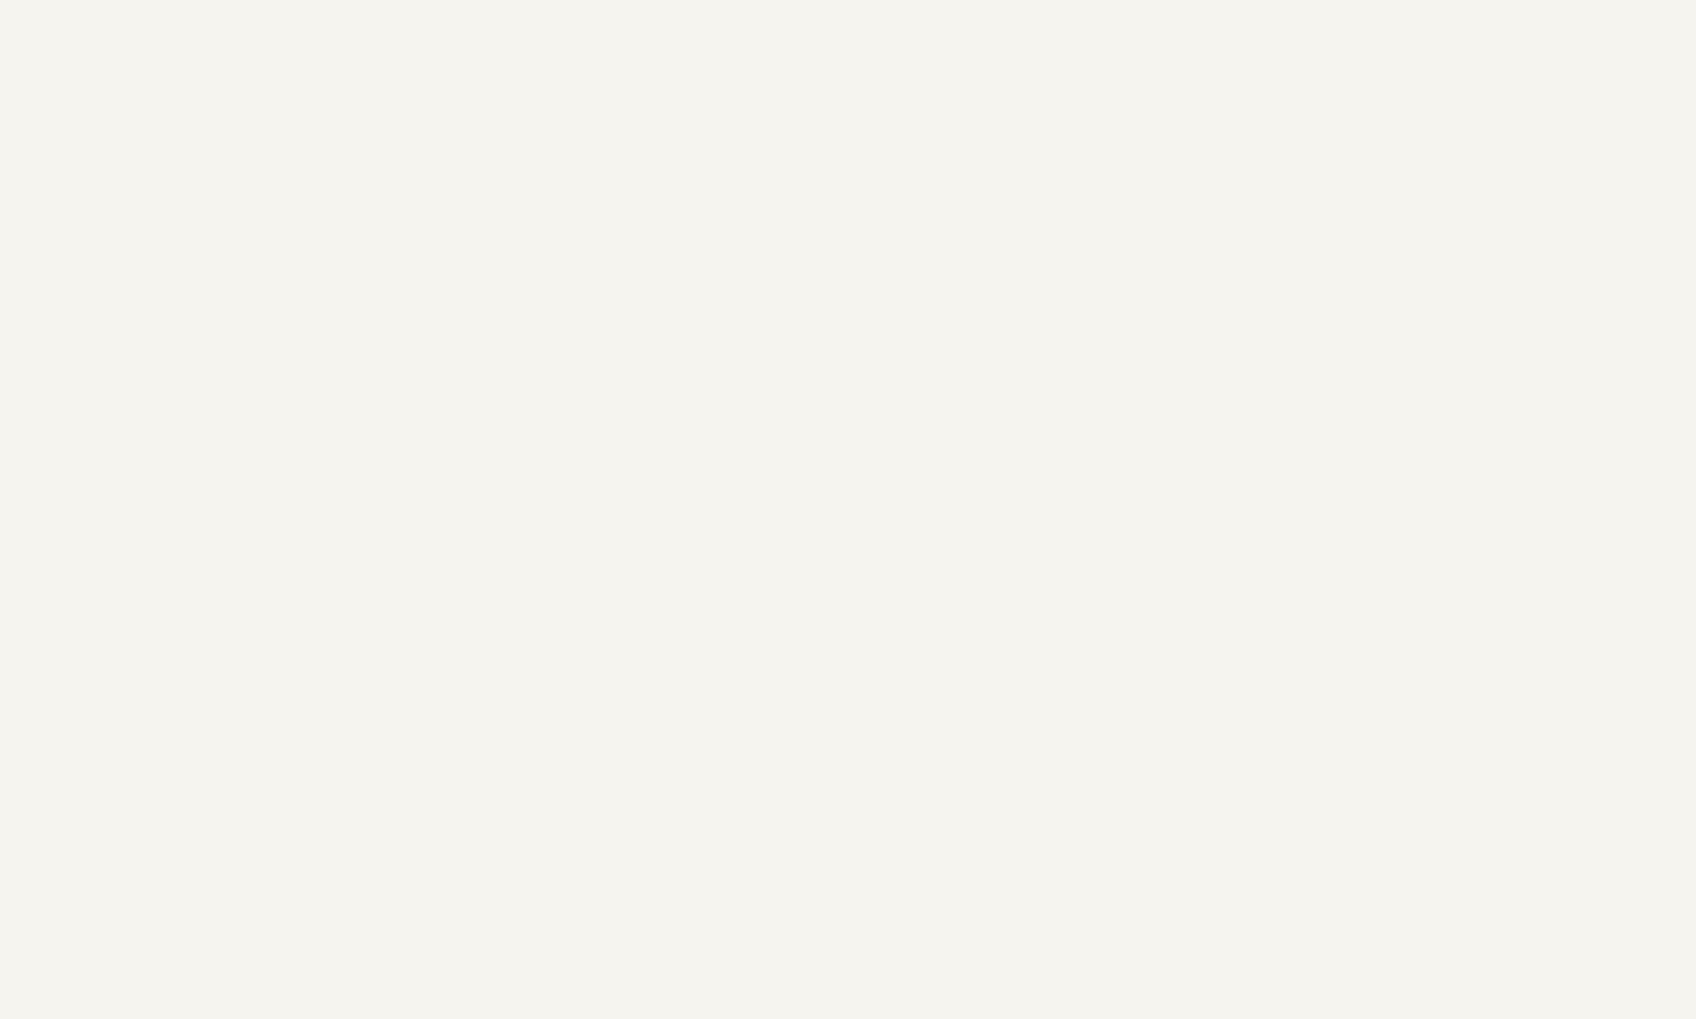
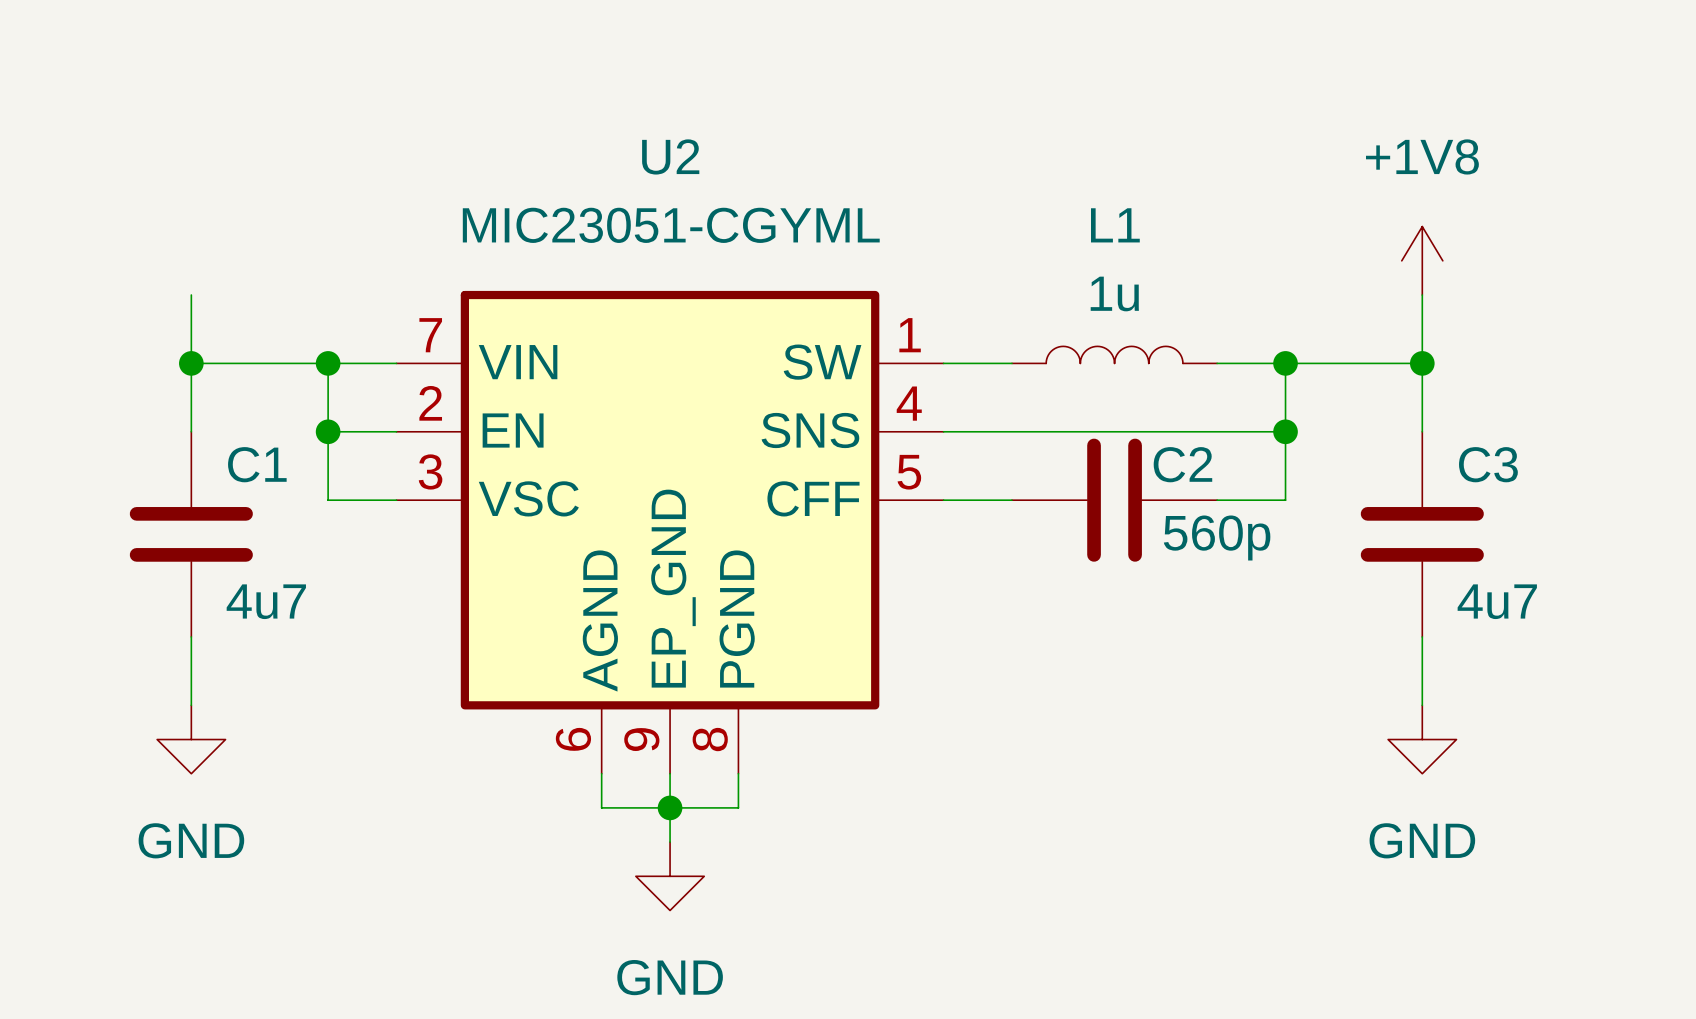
power symbol: none -> +1V8 (1422, 260)
wire: none -> (191, 295) (191, 431)
wire: none -> (1422, 295) (1422, 431)
L1: none -> 1u (1114, 354)
wire: none -> (191, 363) (396, 363)
junction: none -> (191, 363)
wire: none -> (328, 363) (328, 500) (396, 500)
junction: none -> (328, 363)
wire: none -> (943, 363) (1011, 363)
wire: none -> (1217, 363) (1422, 363)
wire: none -> (1285, 363) (1285, 500) (1217, 500)
junction: none -> (1285, 363)
junction: none -> (1422, 363)
wire: none -> (328, 431) (396, 431)
junction: none -> (328, 431)
wire: none -> (943, 431) (1285, 431)
junction: none -> (1285, 431)
wire: none -> (943, 500) (1011, 500)
C2: none -> 560p (1114, 500)
U2: none -> MIC23051-CGYML (670, 532)
C1: none -> 4u7 (191, 534)
C3: none -> 4u7 (1422, 534)
wire: none -> (191, 636) (191, 705)
wire: none -> (1422, 636) (1422, 705)
power symbol: none -> GND (191, 739)
power symbol: none -> GND (1422, 739)
wire: none -> (601, 773) (601, 807) (738, 807) (738, 773)
wire: none -> (670, 773) (670, 842)
junction: none -> (670, 807)
power symbol: none -> GND (670, 876)

